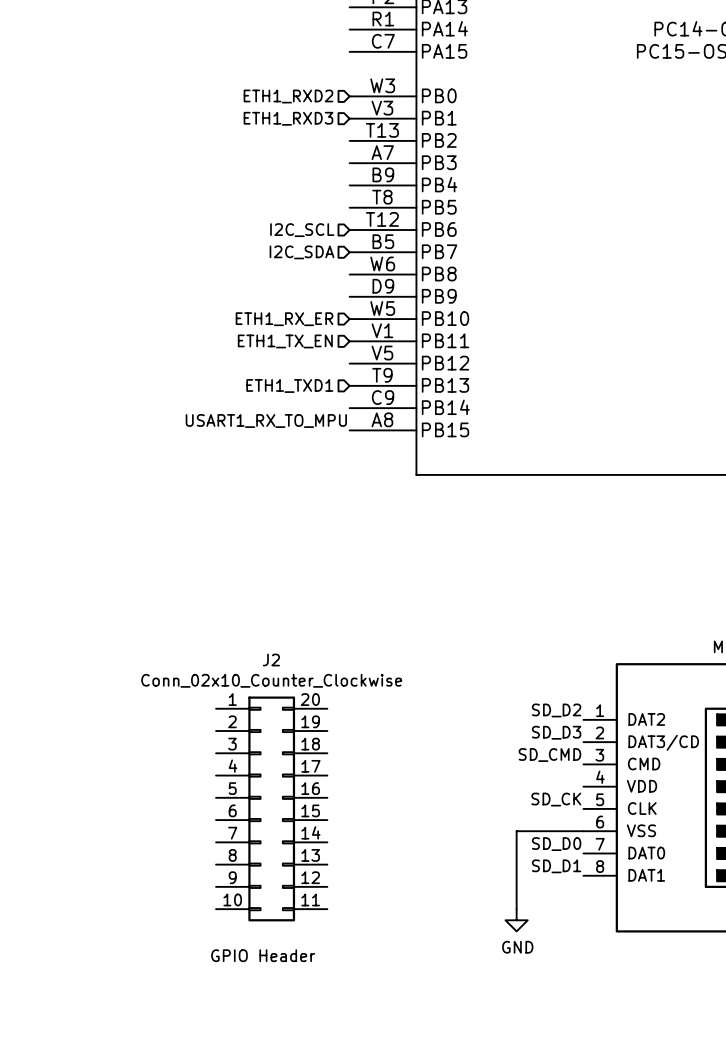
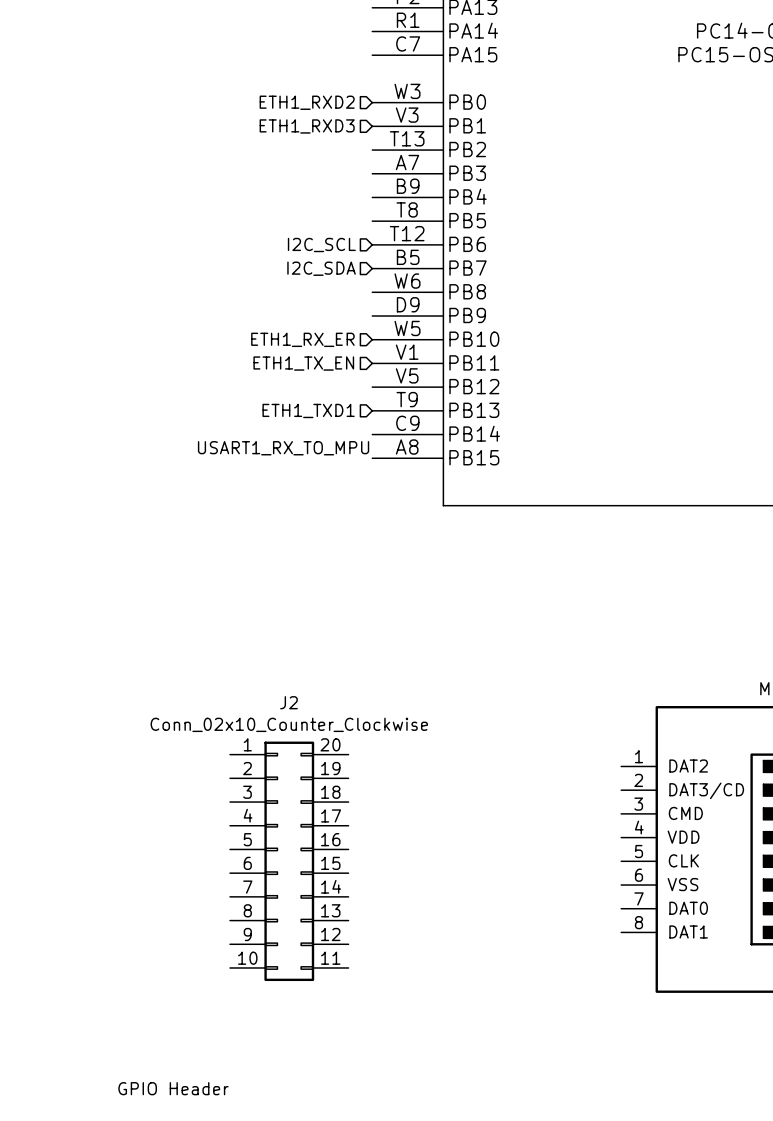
label: SD_D2 (556, 710) -> none
label: SD_D3 (556, 732) -> none
label: SD_CMD (549, 755) -> none
label: SD_CK (556, 799) -> none
wire: (583, 831) (516, 831) (516, 909) -> none
label: SD_D0 (556, 844) -> none
label: SD_D1 (556, 866) -> none
power symbol: GND (516, 920) -> none
text position: GPIO Header (263, 955) -> GPIO Header (173, 1088)

